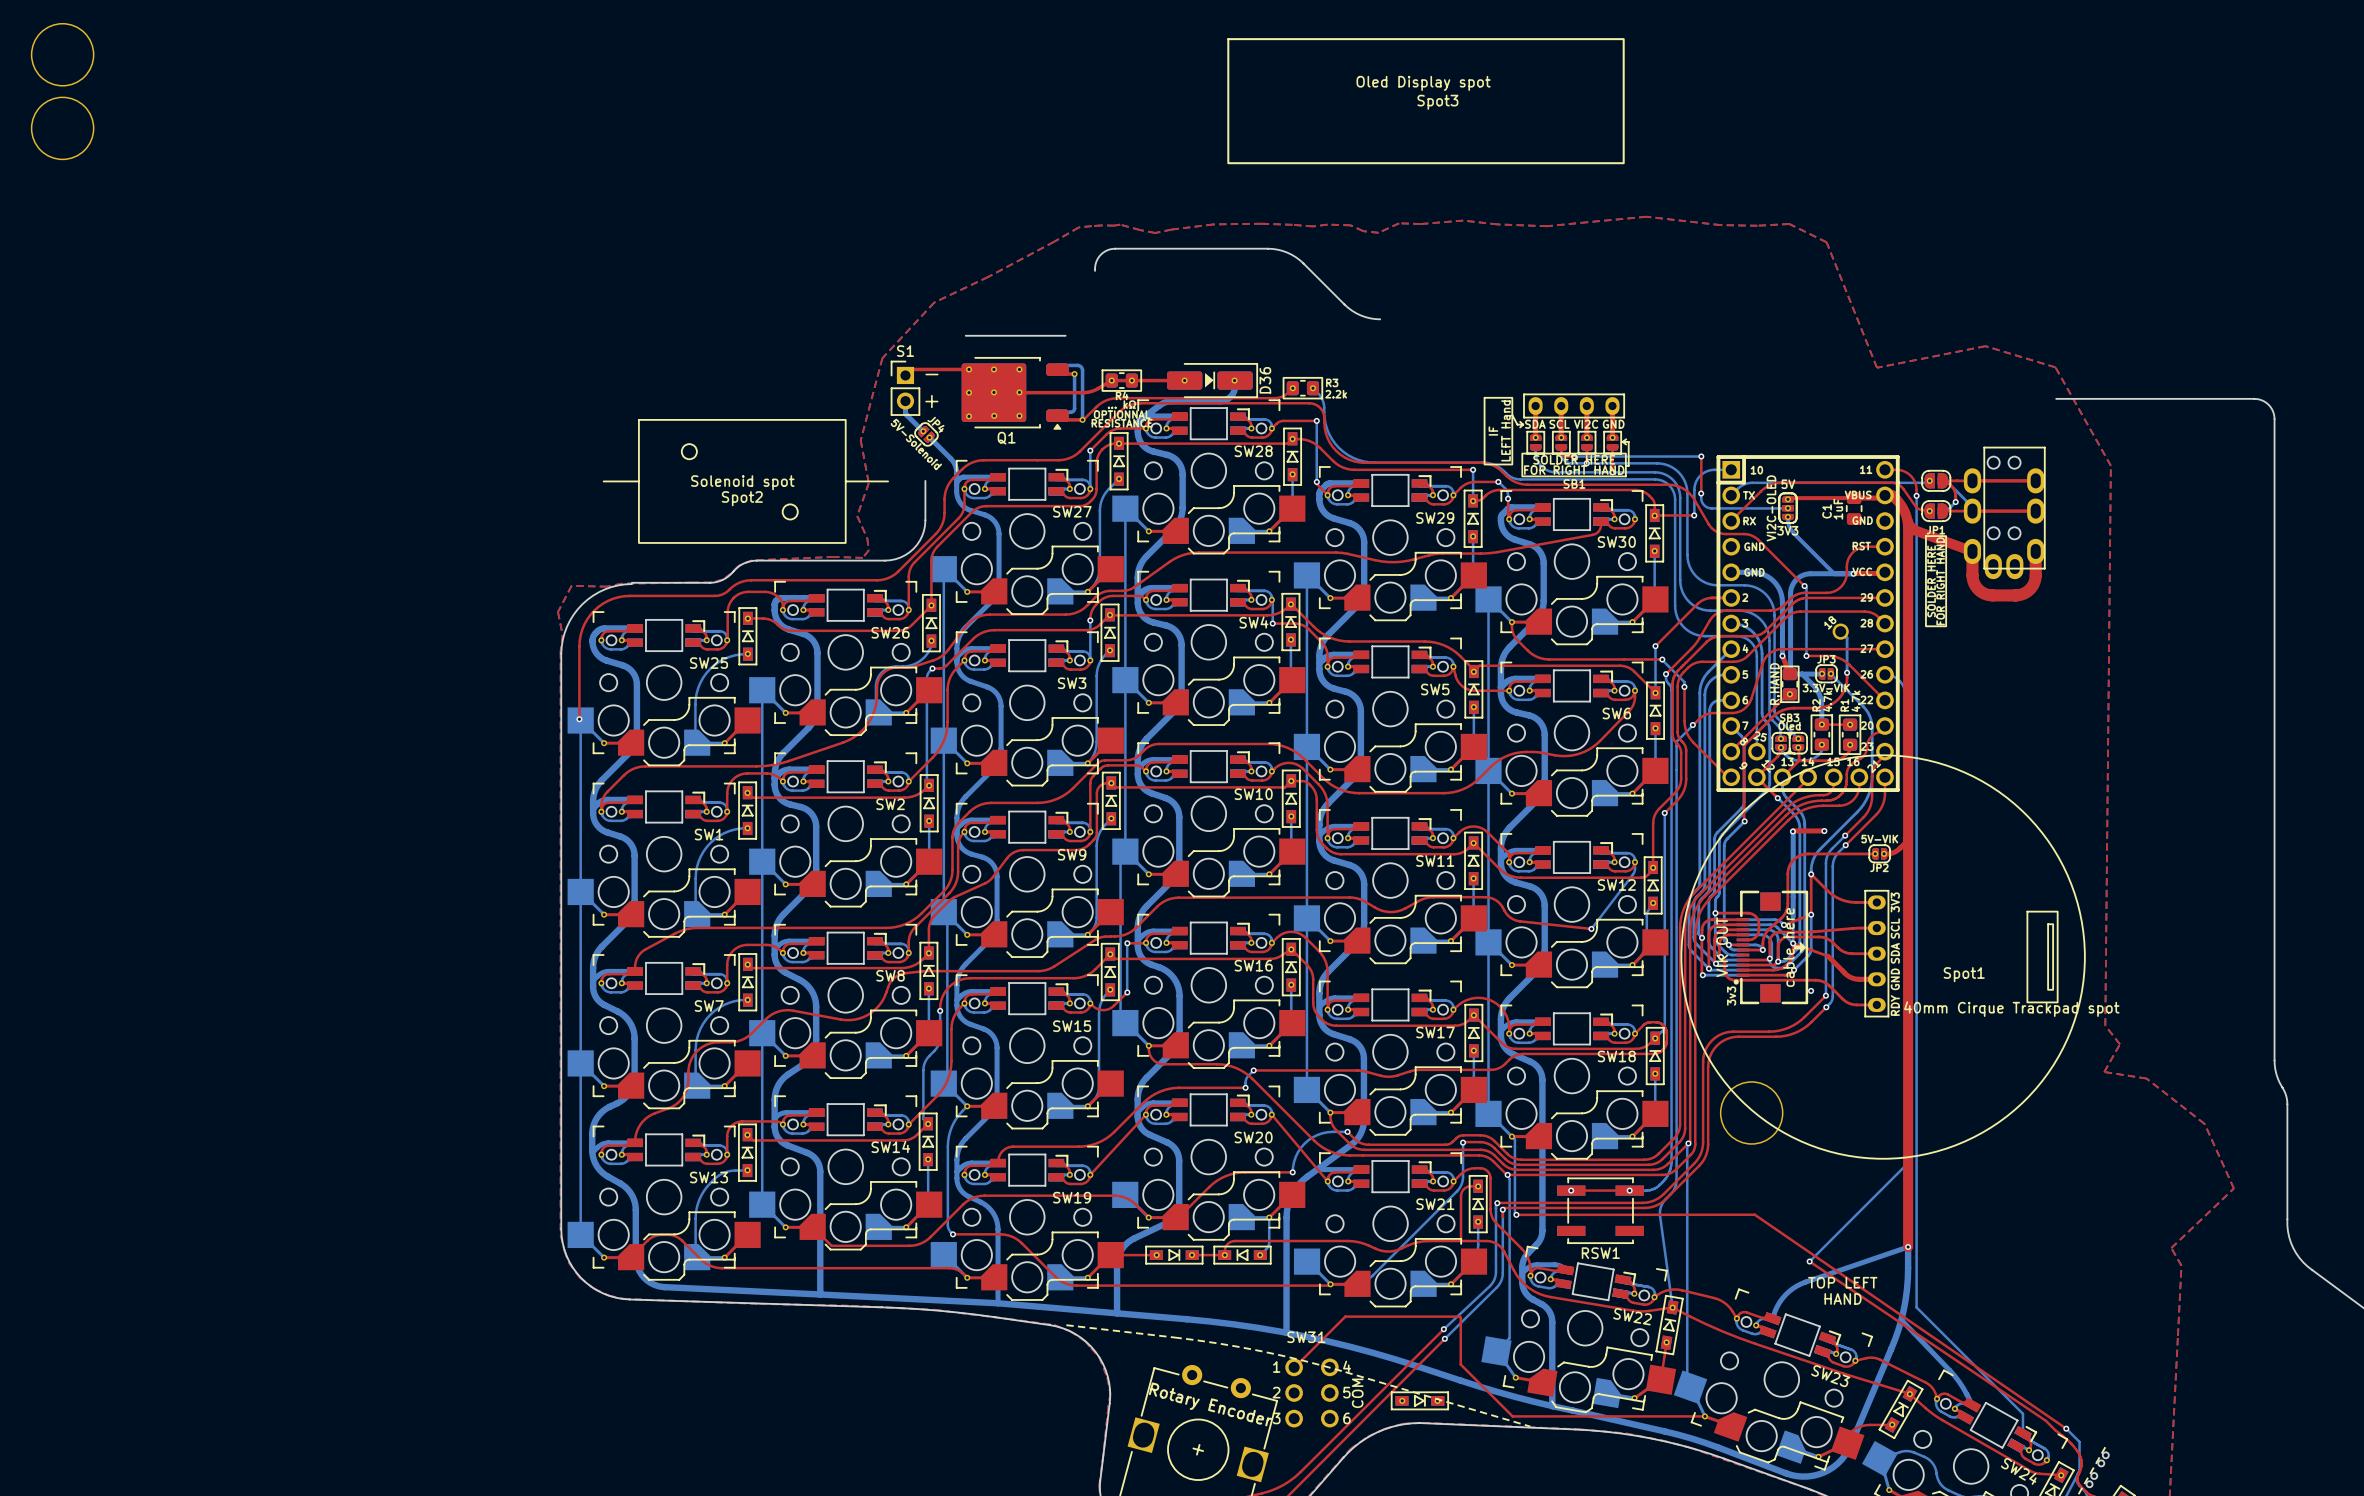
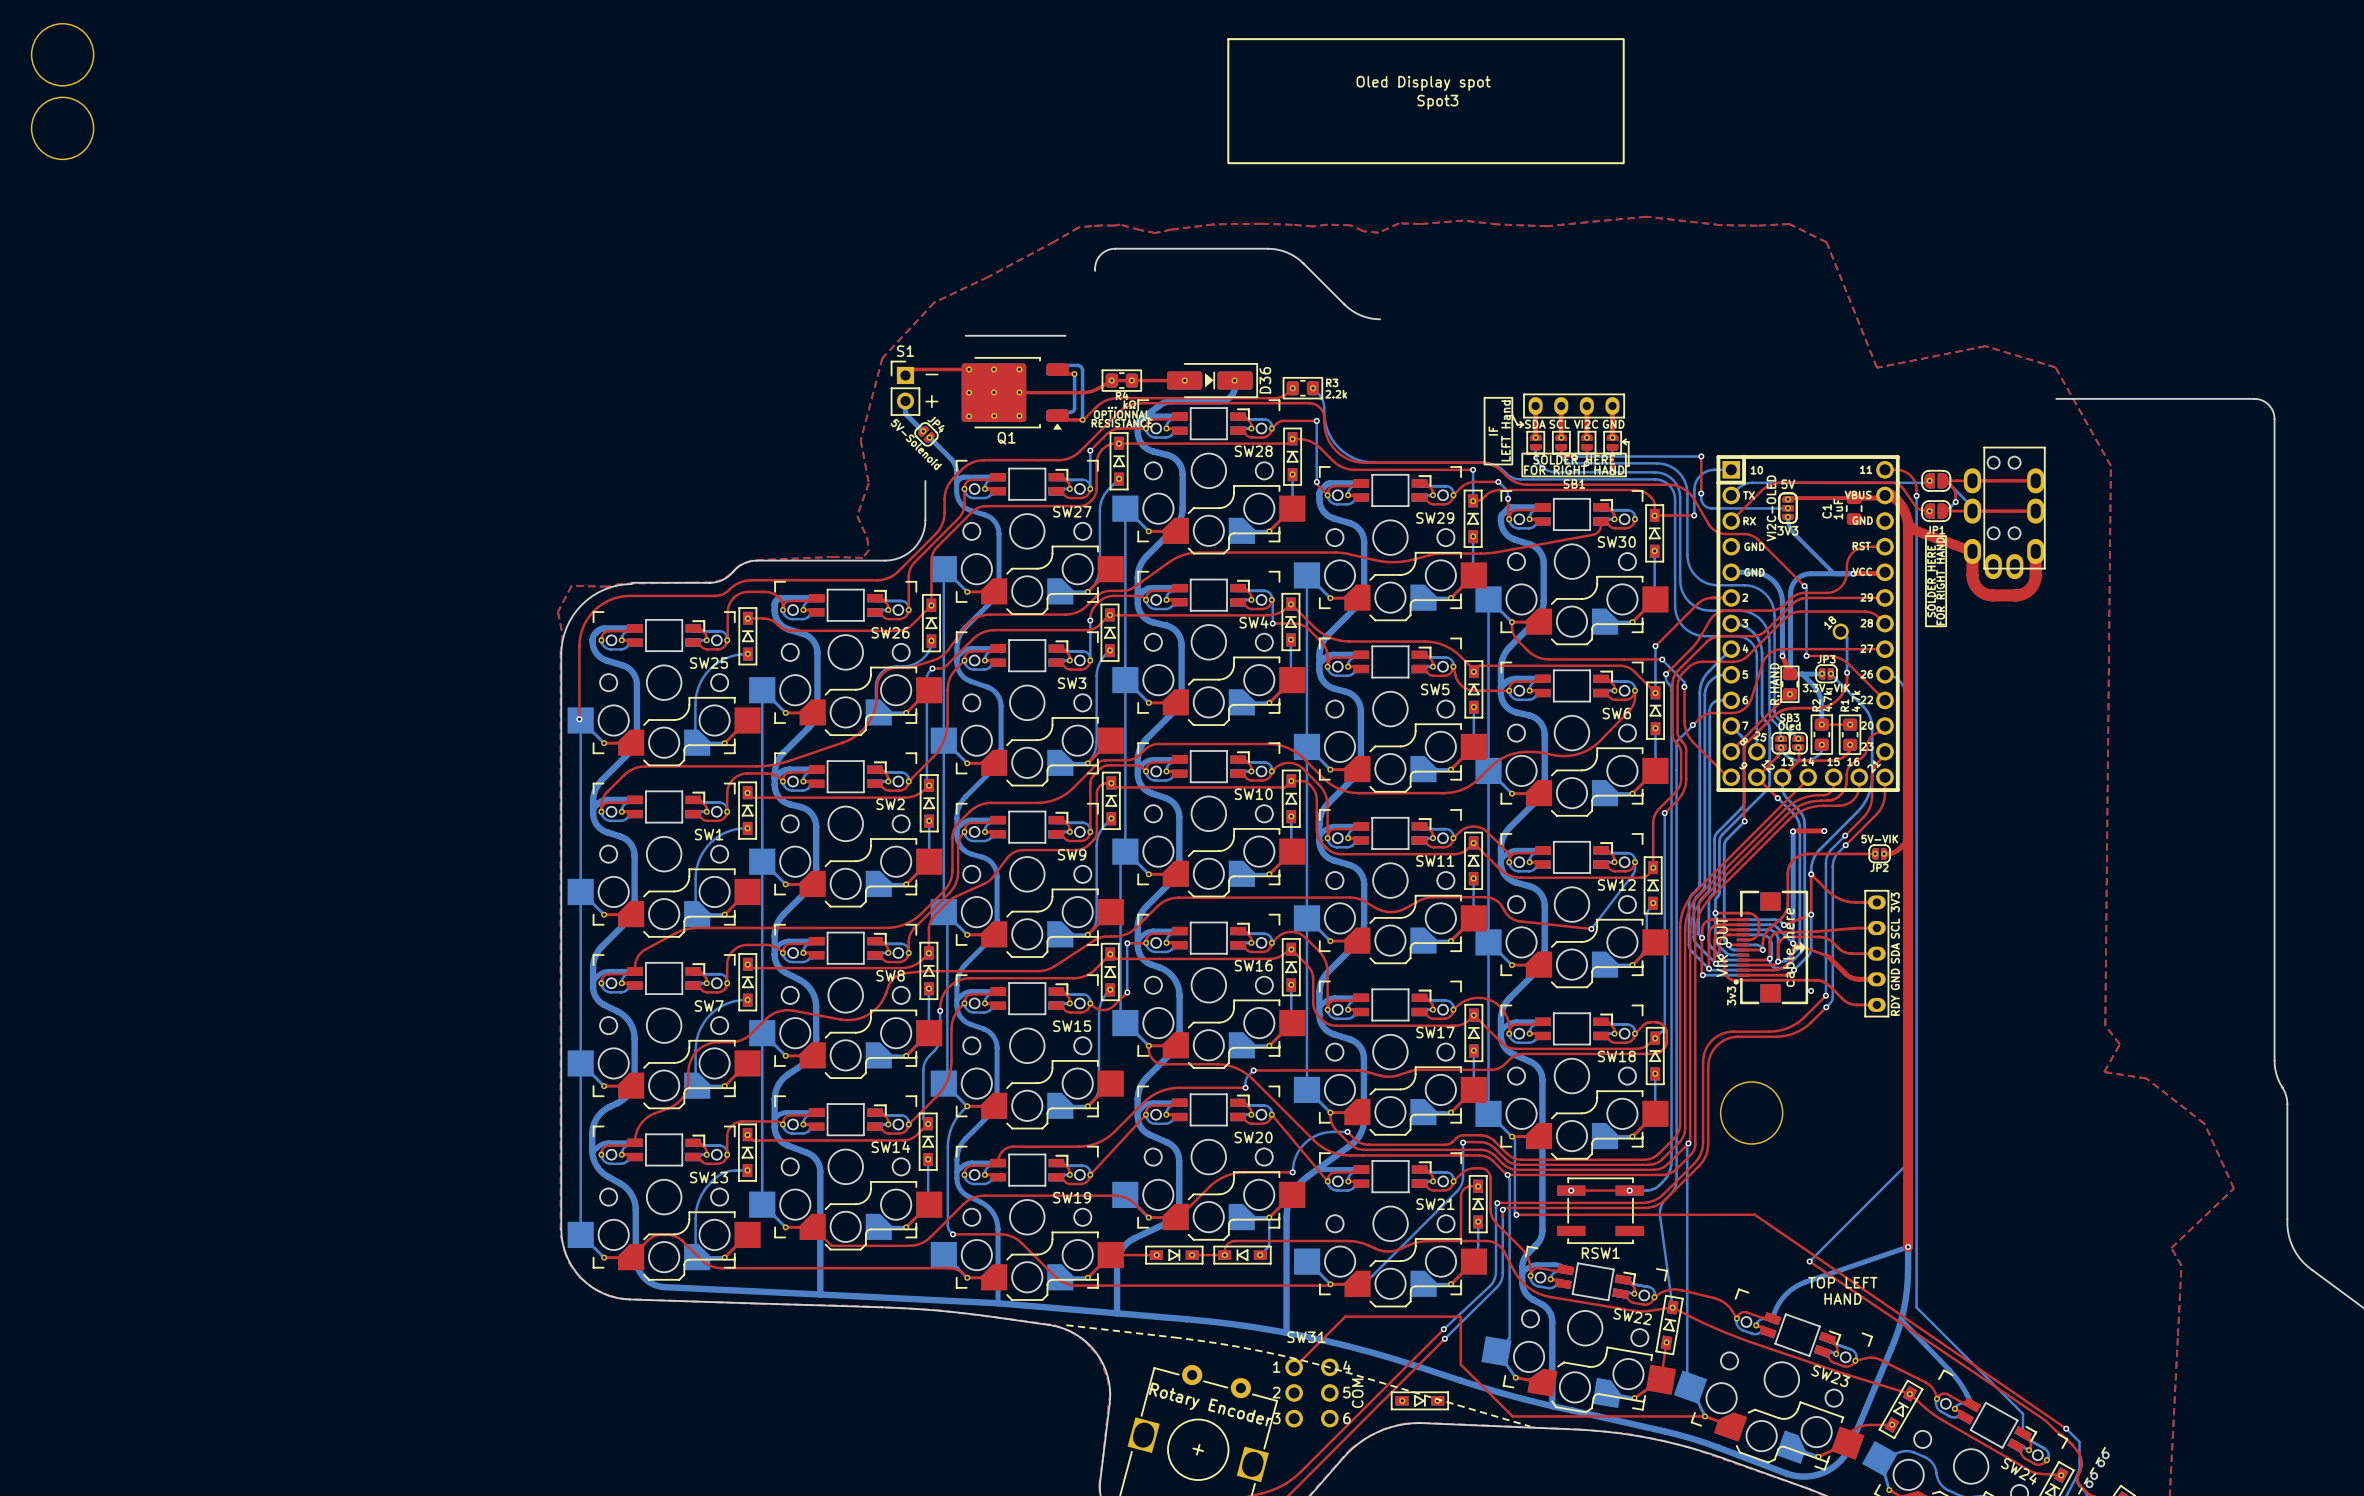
Spot2: Solenoid spot (745, 481) -> none
Spot1: 40mm Cirque Trackpad spot (1883, 957) -> none

